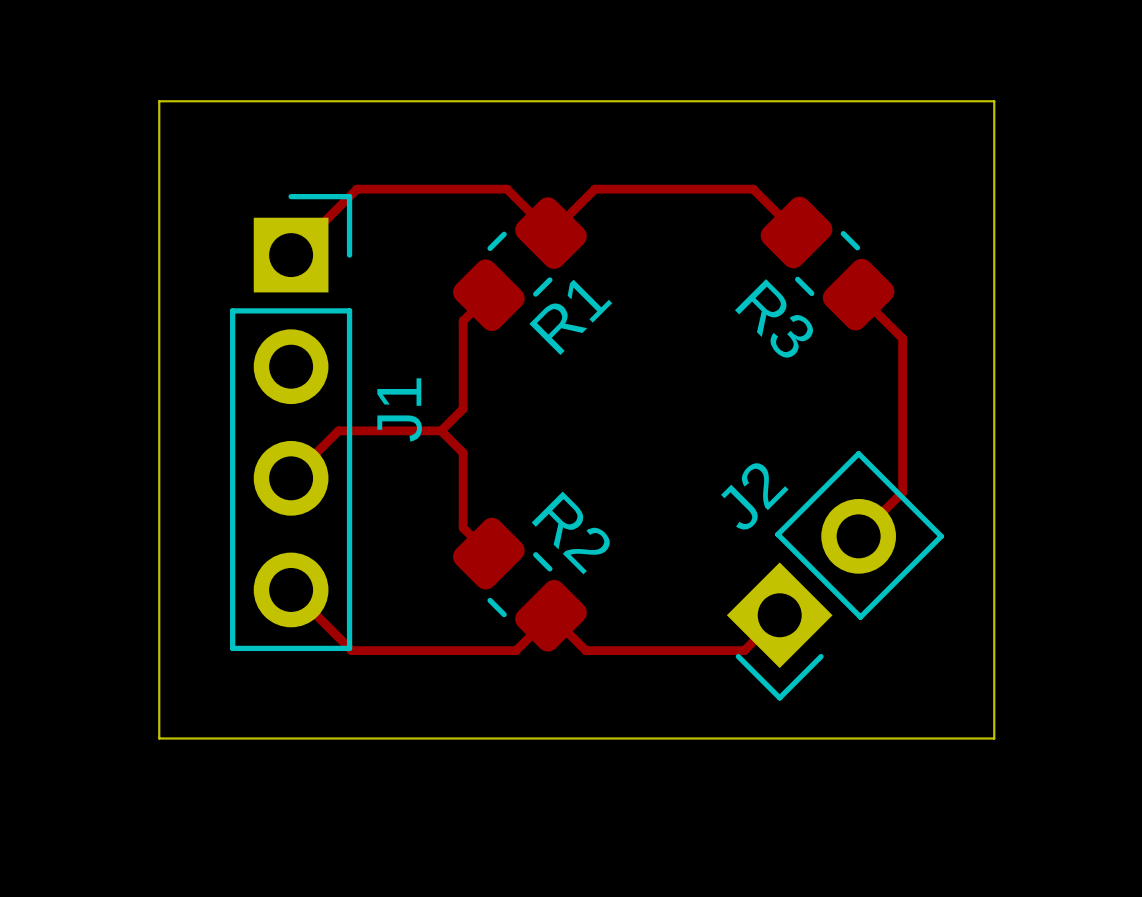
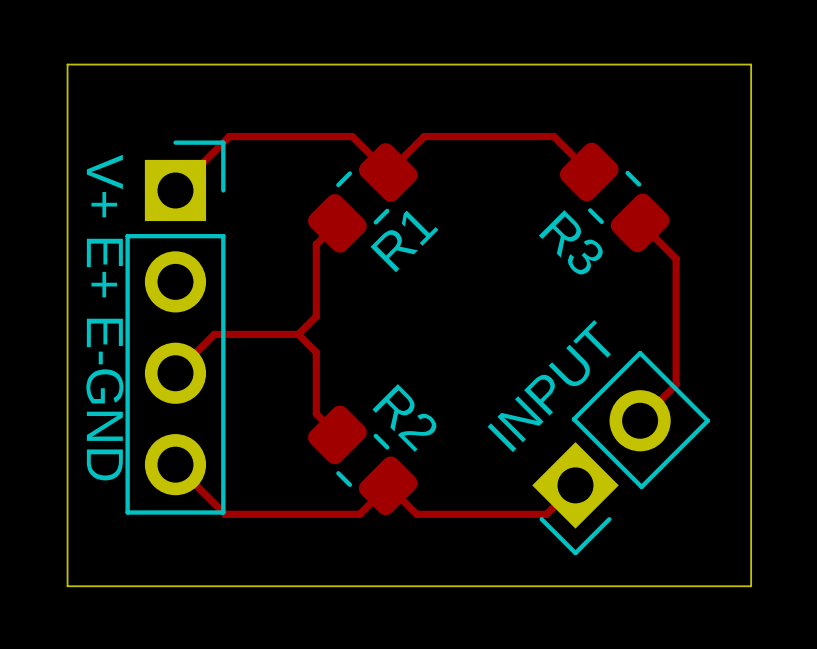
J1 name: J1 (399, 409) -> none
text: none -> V+ E+ E-GND (104, 317)
J2 name: J2 (754, 498) -> INPUT (549, 386)

